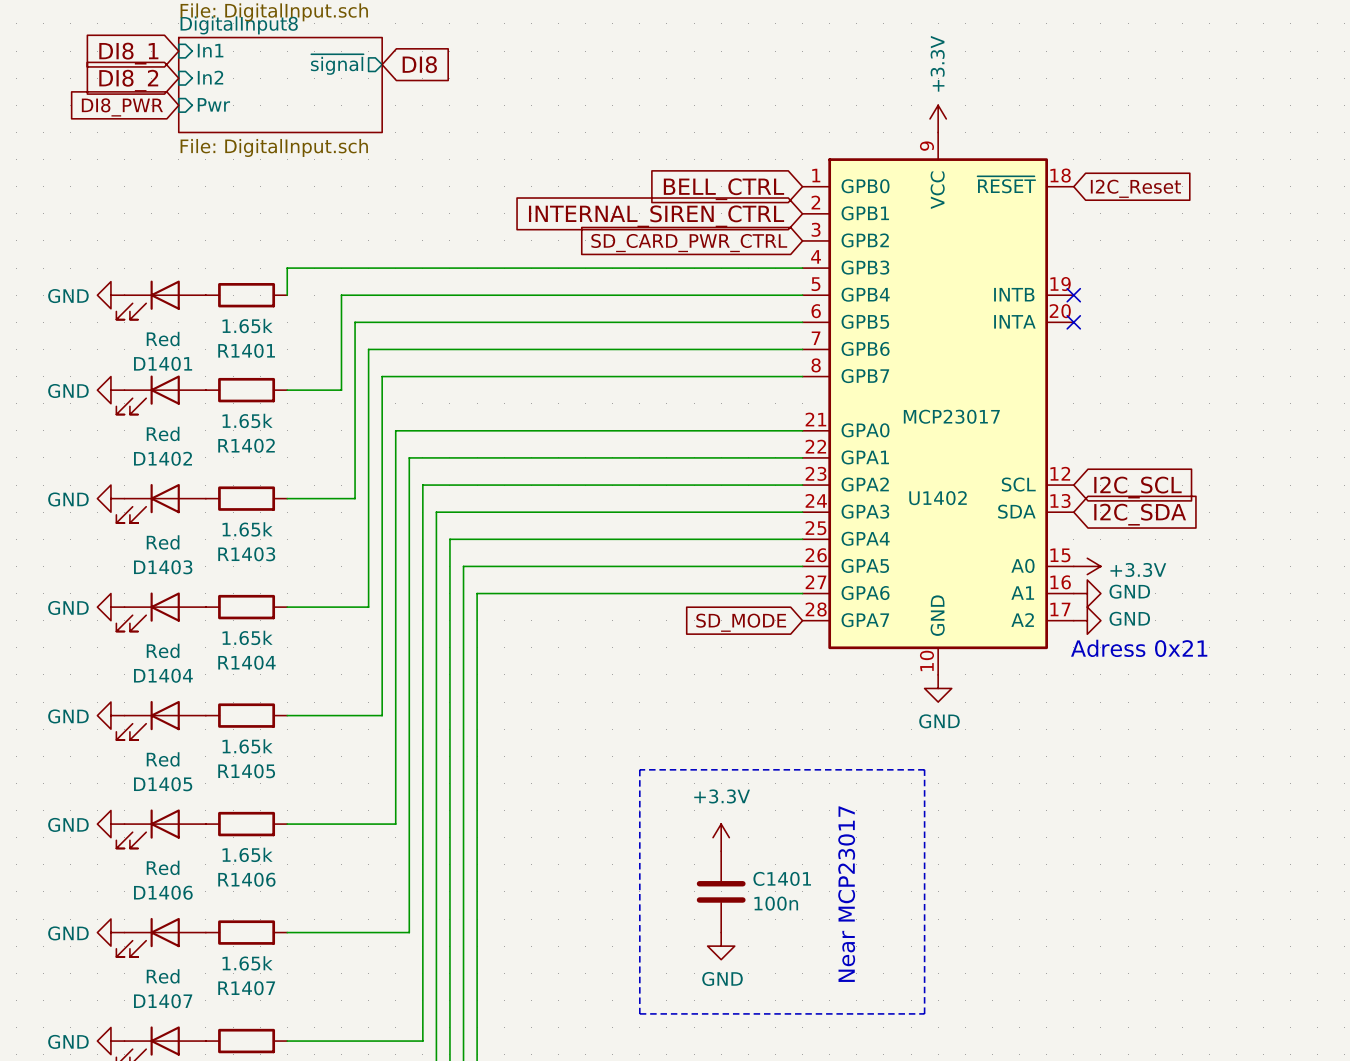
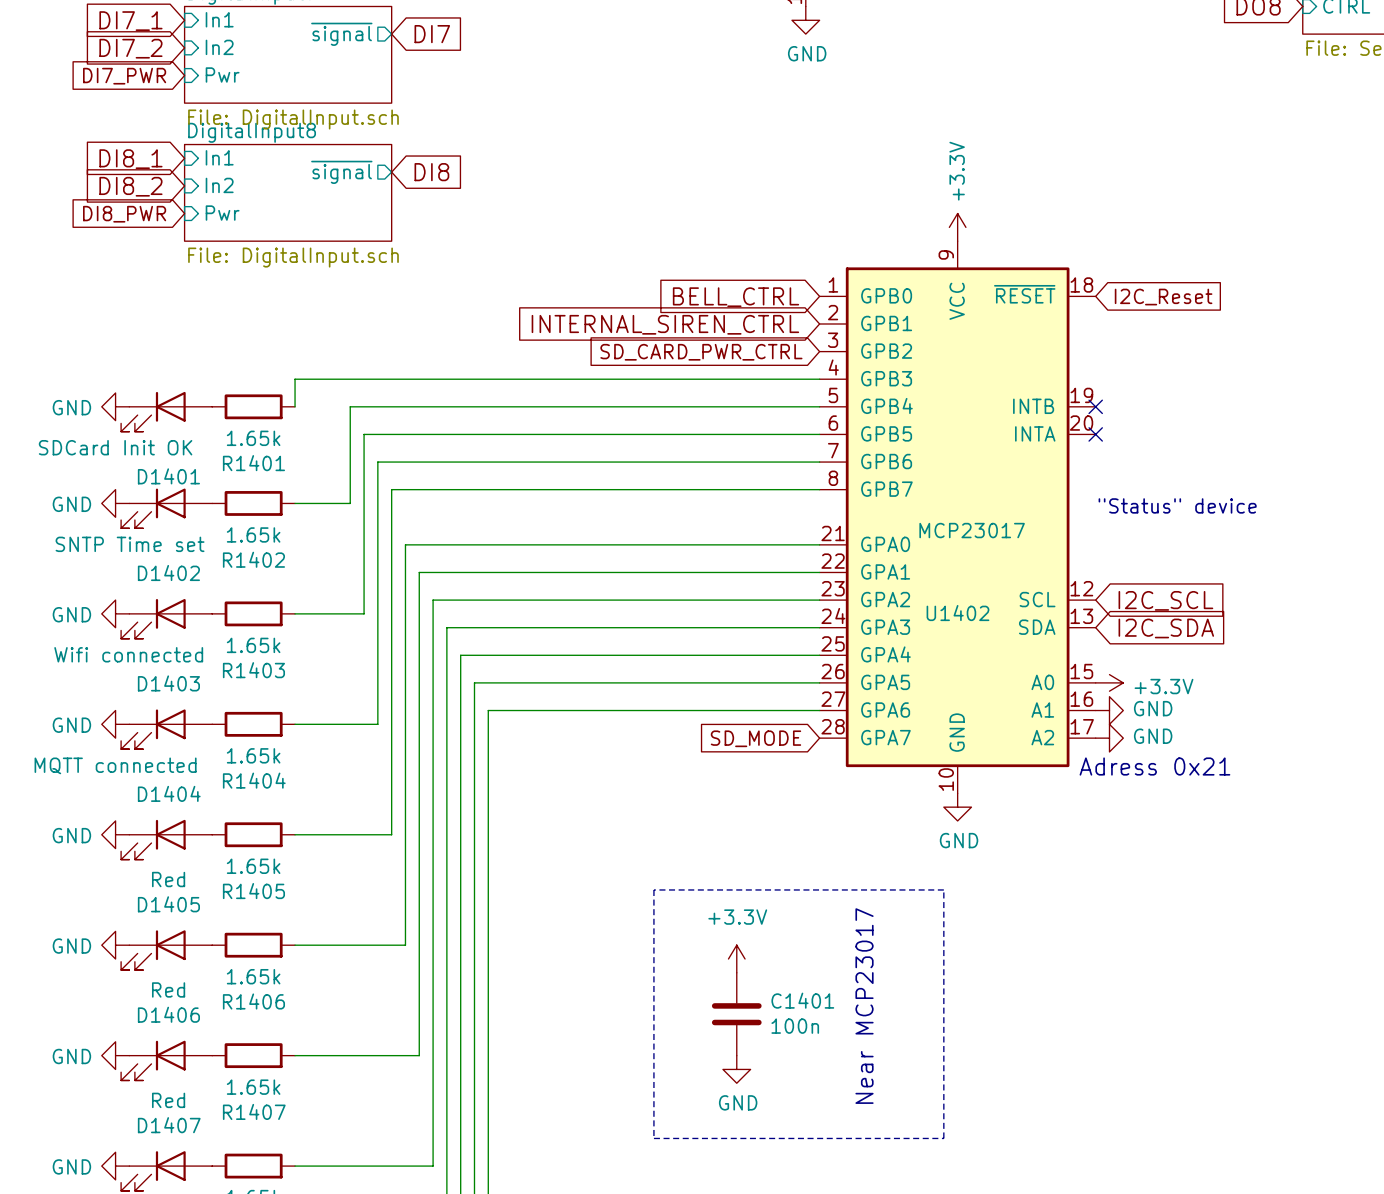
D1401 value: Red (163, 339) -> SDCard Init OK (115, 447)
text: none -> "Status" device (1177, 505)
D1402 value: Red (163, 433) -> SNTP Time set (130, 544)
D1403 value: Red (163, 542) -> Wifi connected (128, 654)
D1404 value: Red (163, 650) -> MQTT connected (115, 765)

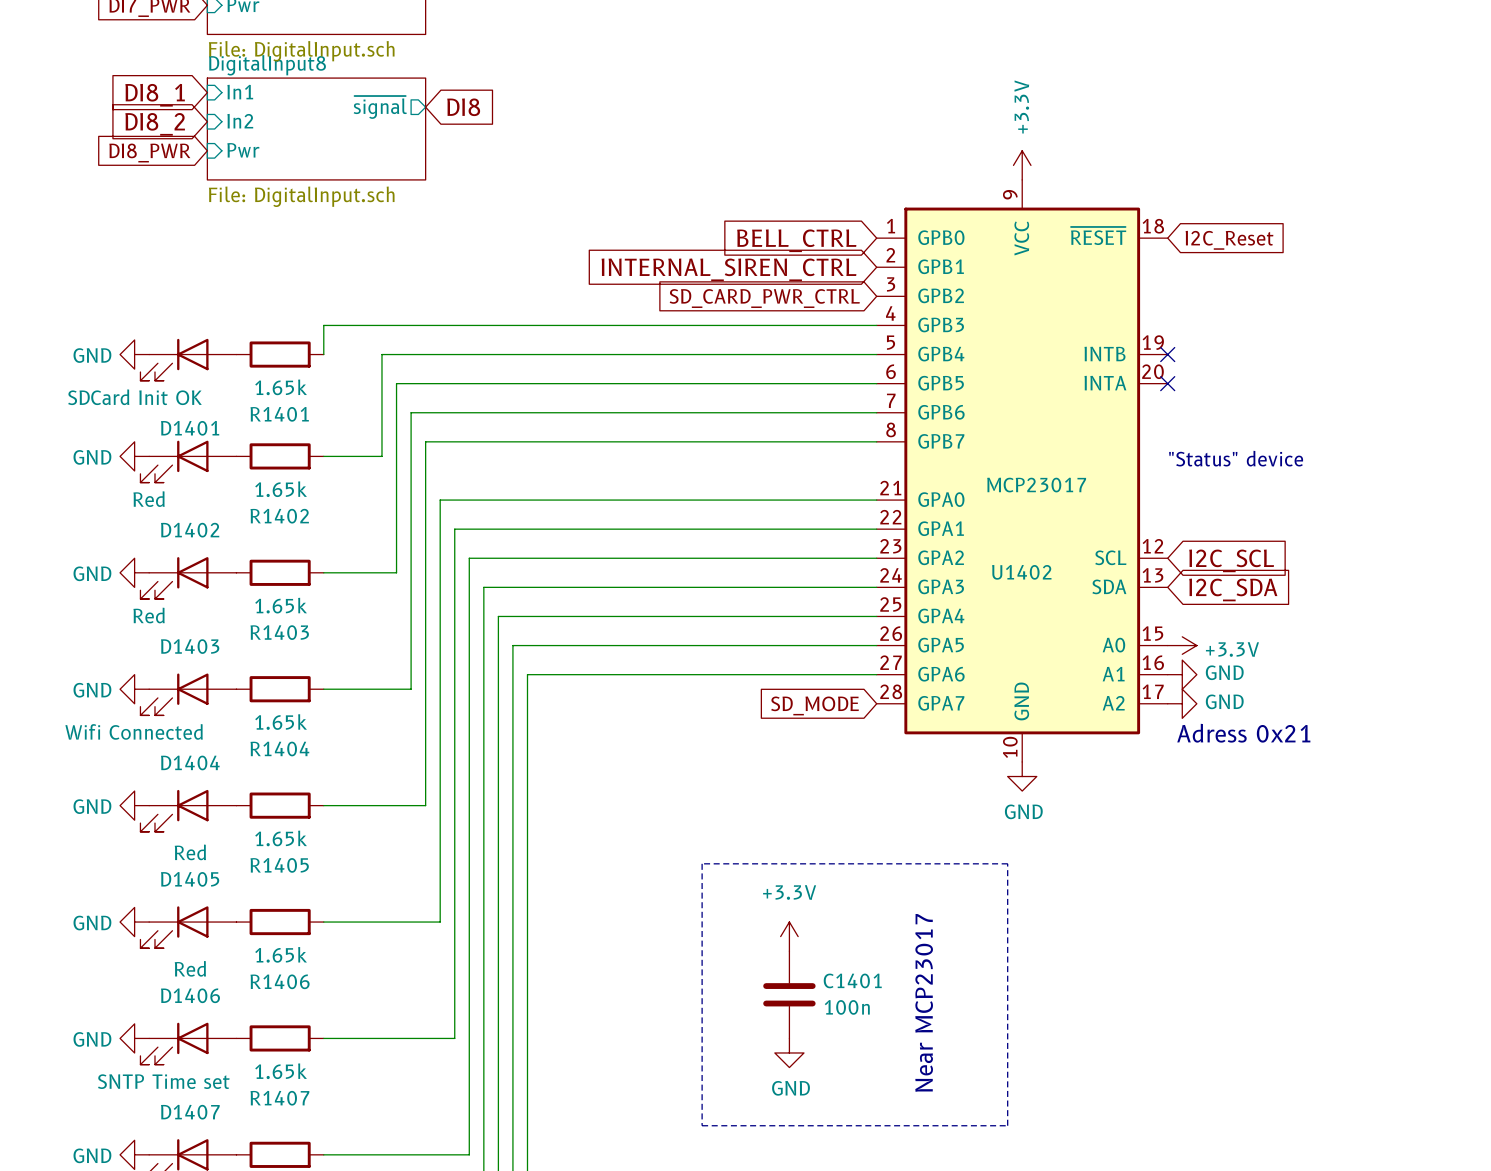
D1402 value: SNTP Time set (130, 544) -> Red (149, 499)
D1403 value: Wifi connected (128, 654) -> Red (149, 615)
D1404 value: MQTT connected (115, 765) -> Wifi Connected (134, 731)
D1407 value: Red (168, 1100) -> SNTP Time set (163, 1081)

